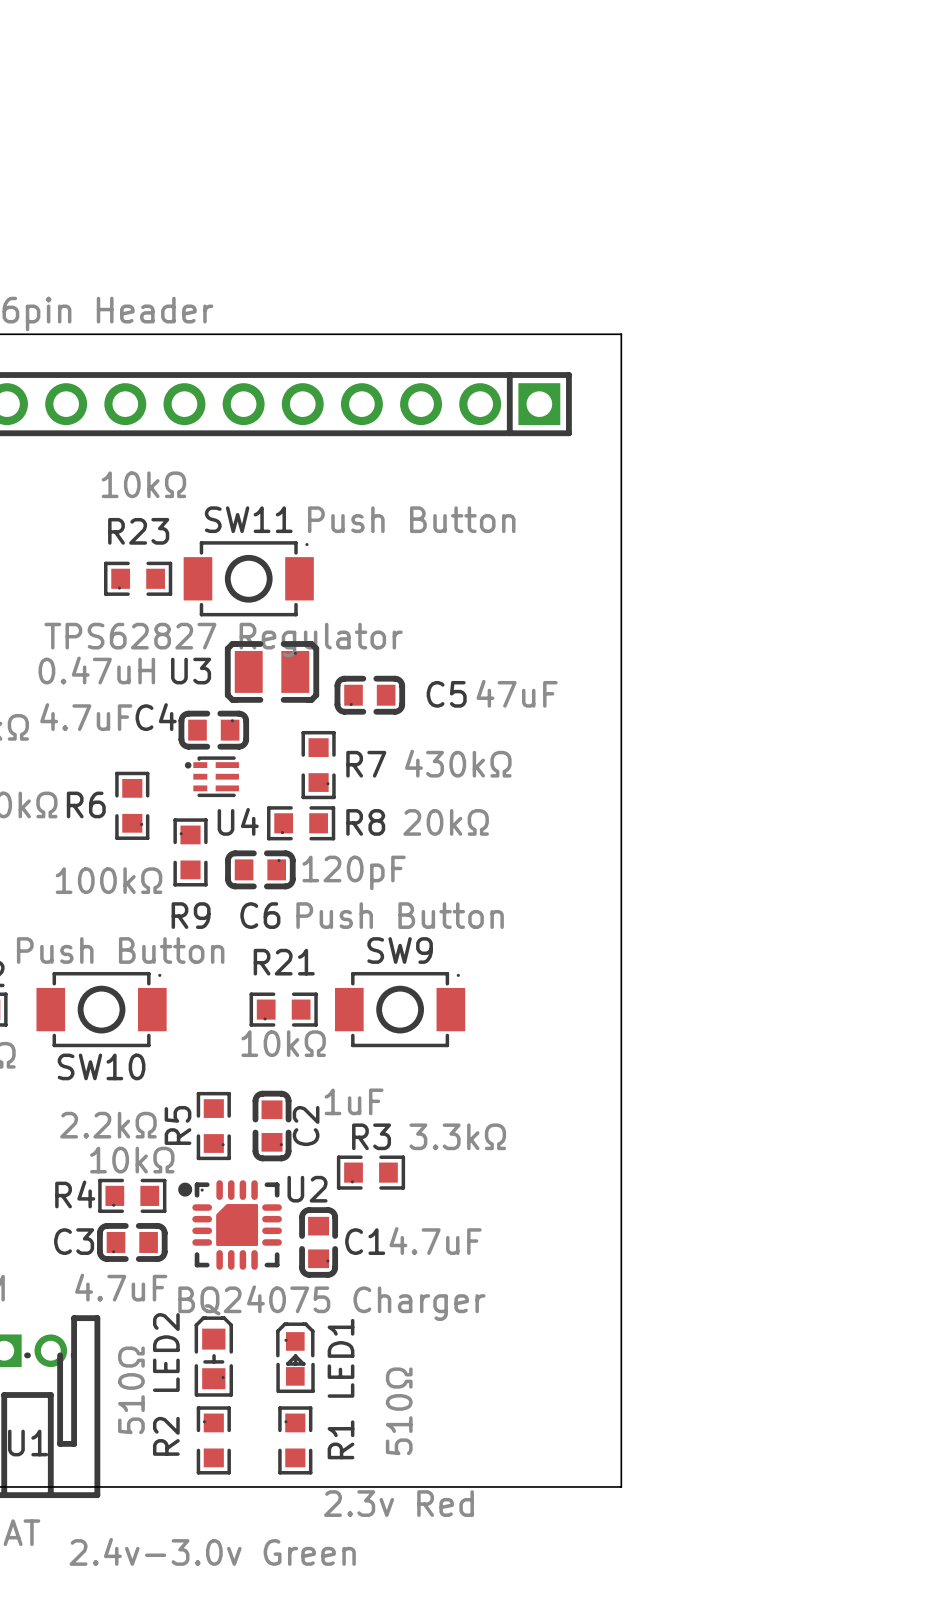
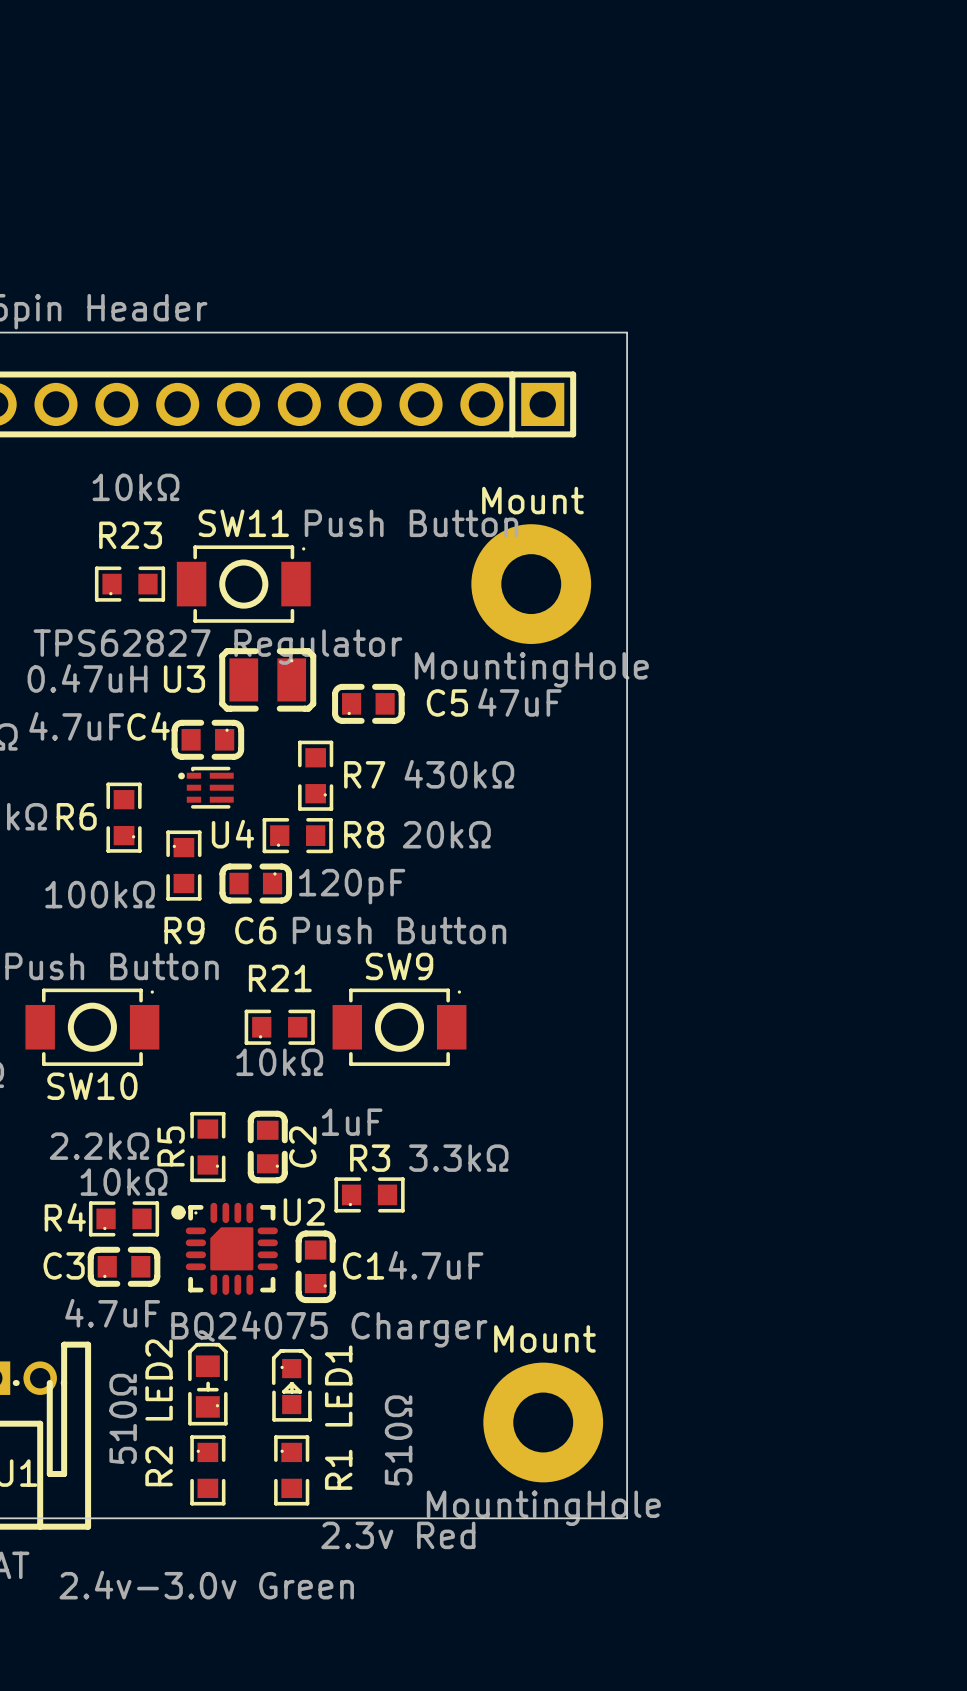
Mount: none -> MountingHole (531, 584)
Mount: none -> MountingHole (543, 1422)

